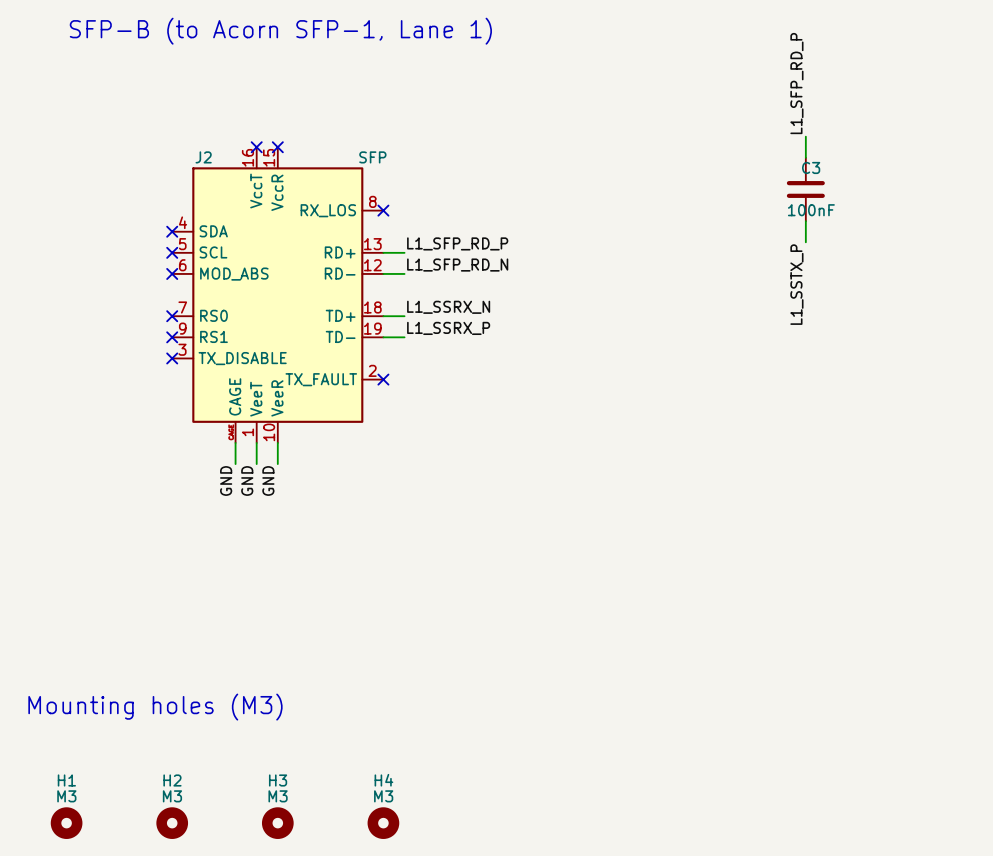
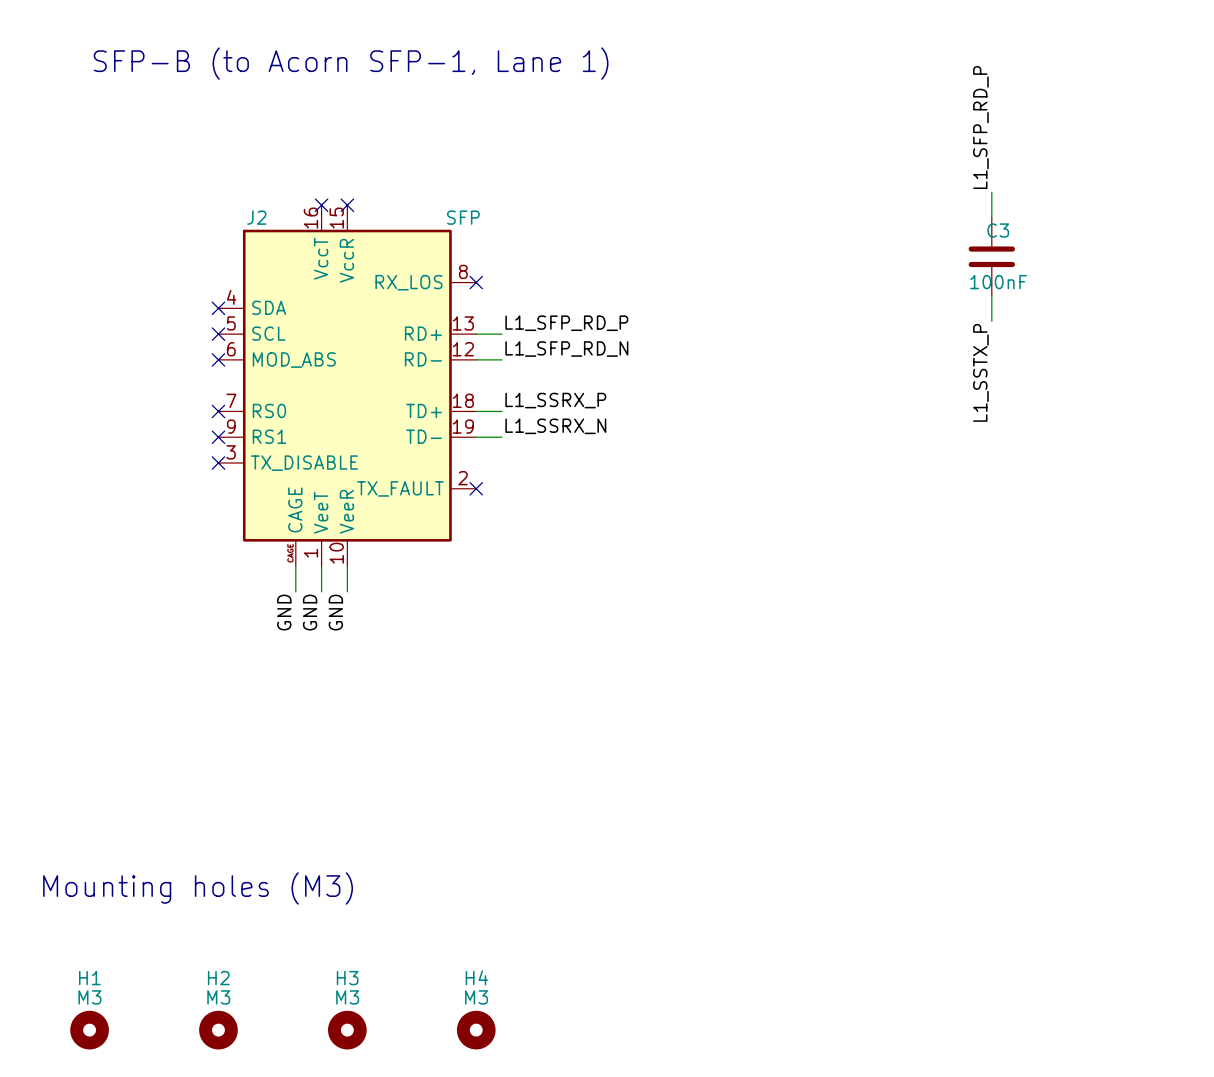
label: L1_SSRX_N (448, 307) -> L1_SSRX_P (555, 400)
label: L1_SSRX_P (448, 328) -> L1_SSRX_N (555, 426)

